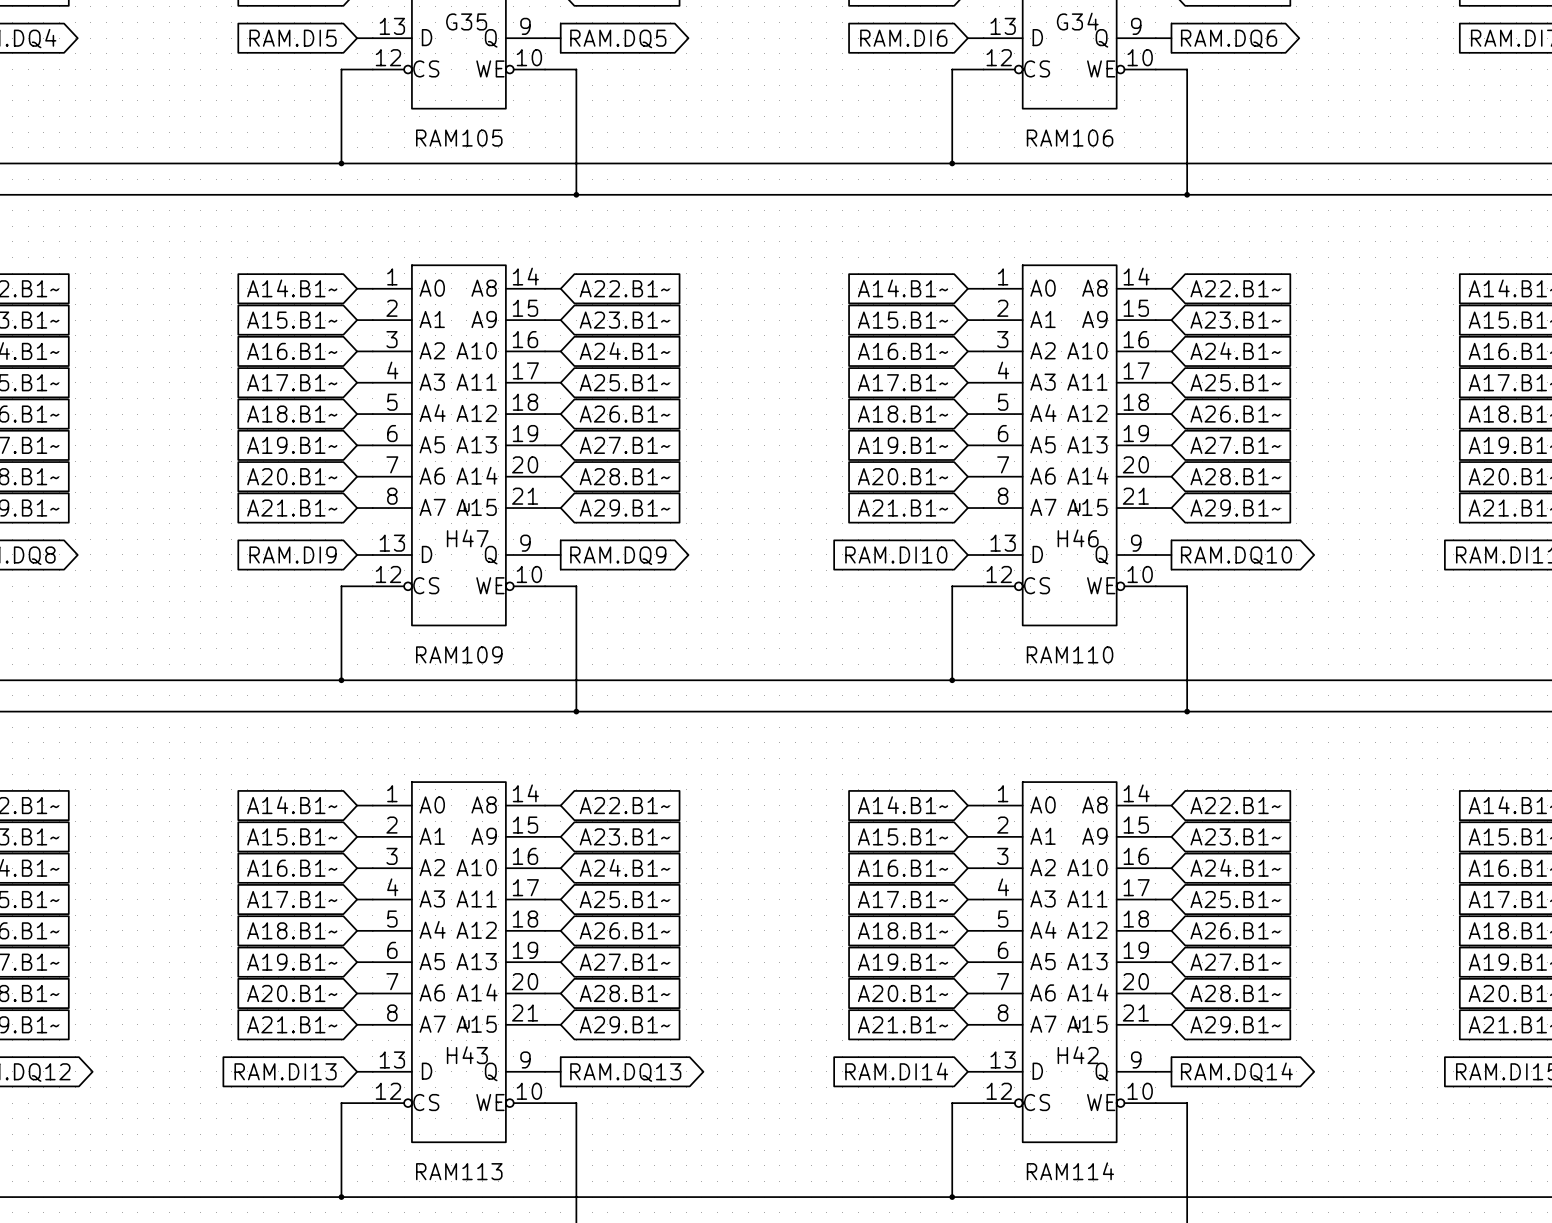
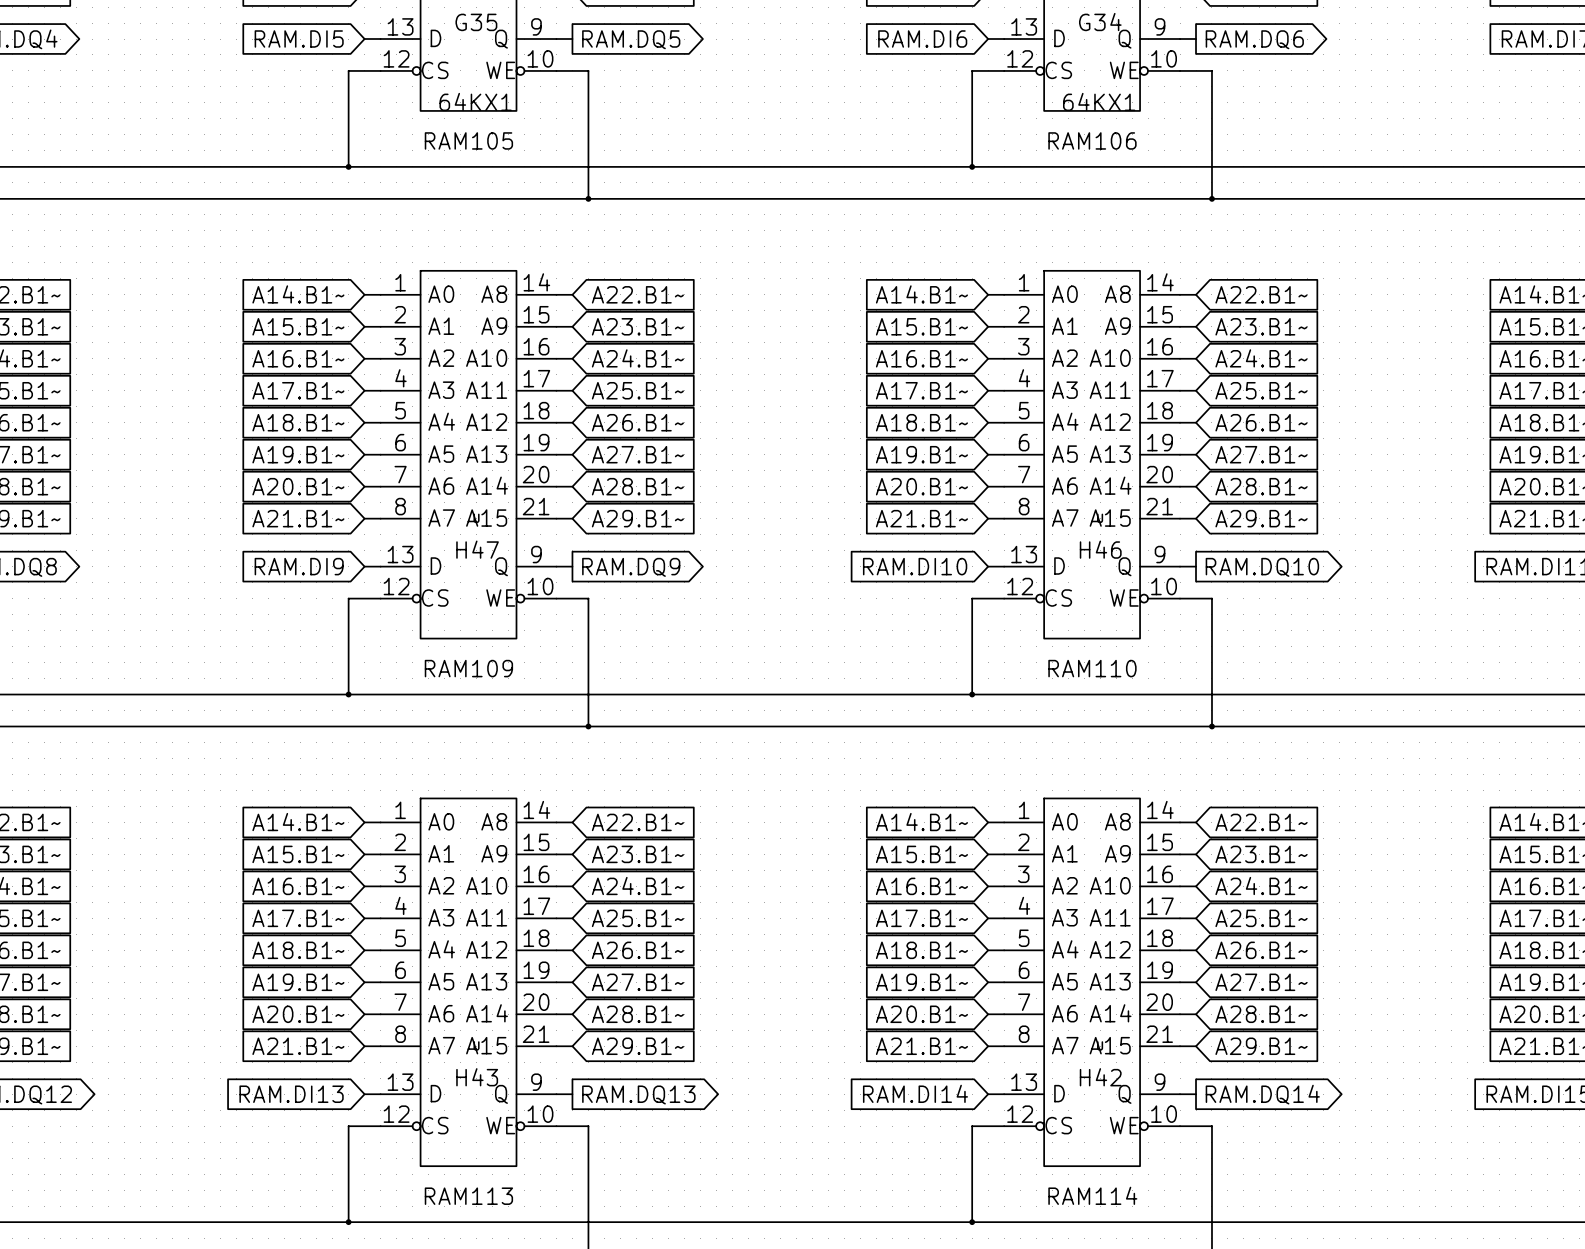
part value: none -> 64KX1 (475, 101)
part value: none -> 64KX1 (1099, 101)

